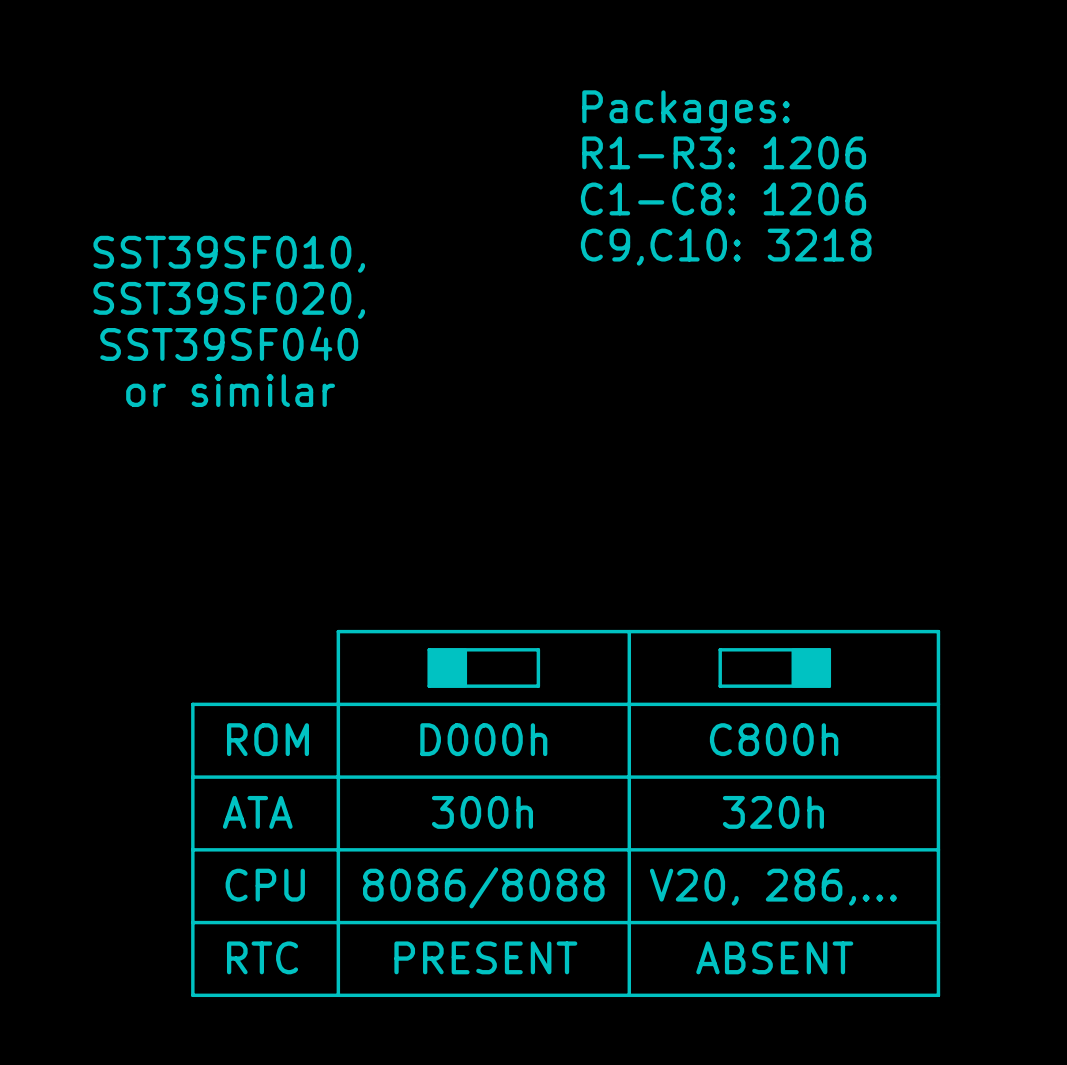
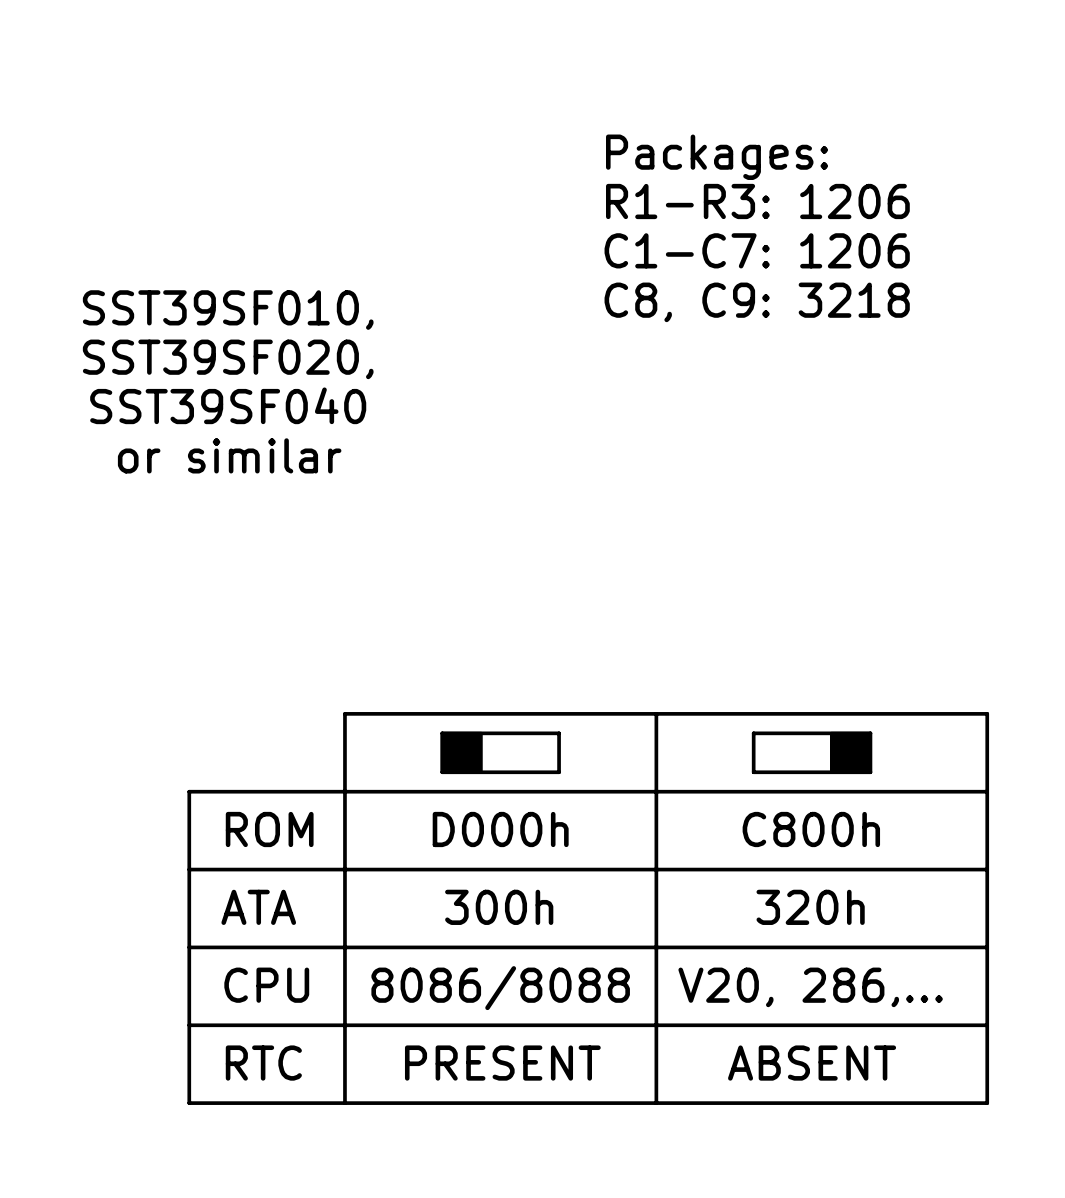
text: C1-C8: 1206 (723, 198) -> C1-C7: 1206 (757, 250)
text: C9,C10: 3218 (726, 247) -> C8, C9: 3218 (757, 302)

